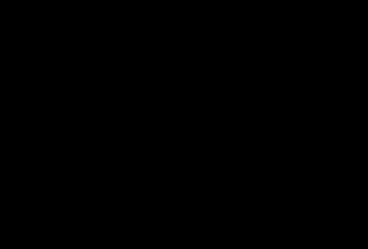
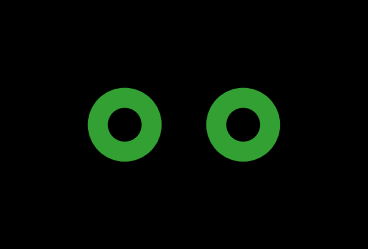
part: none -> (183, 124)

